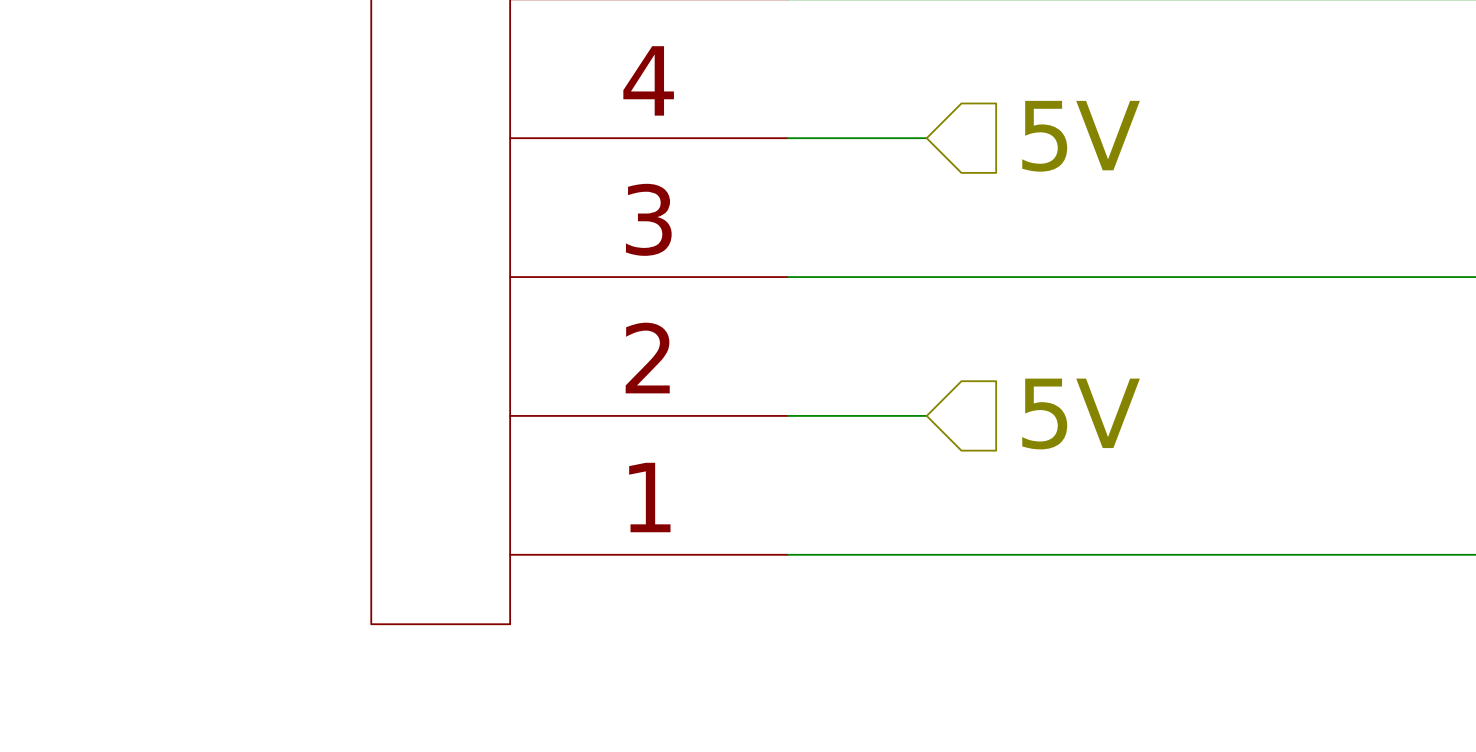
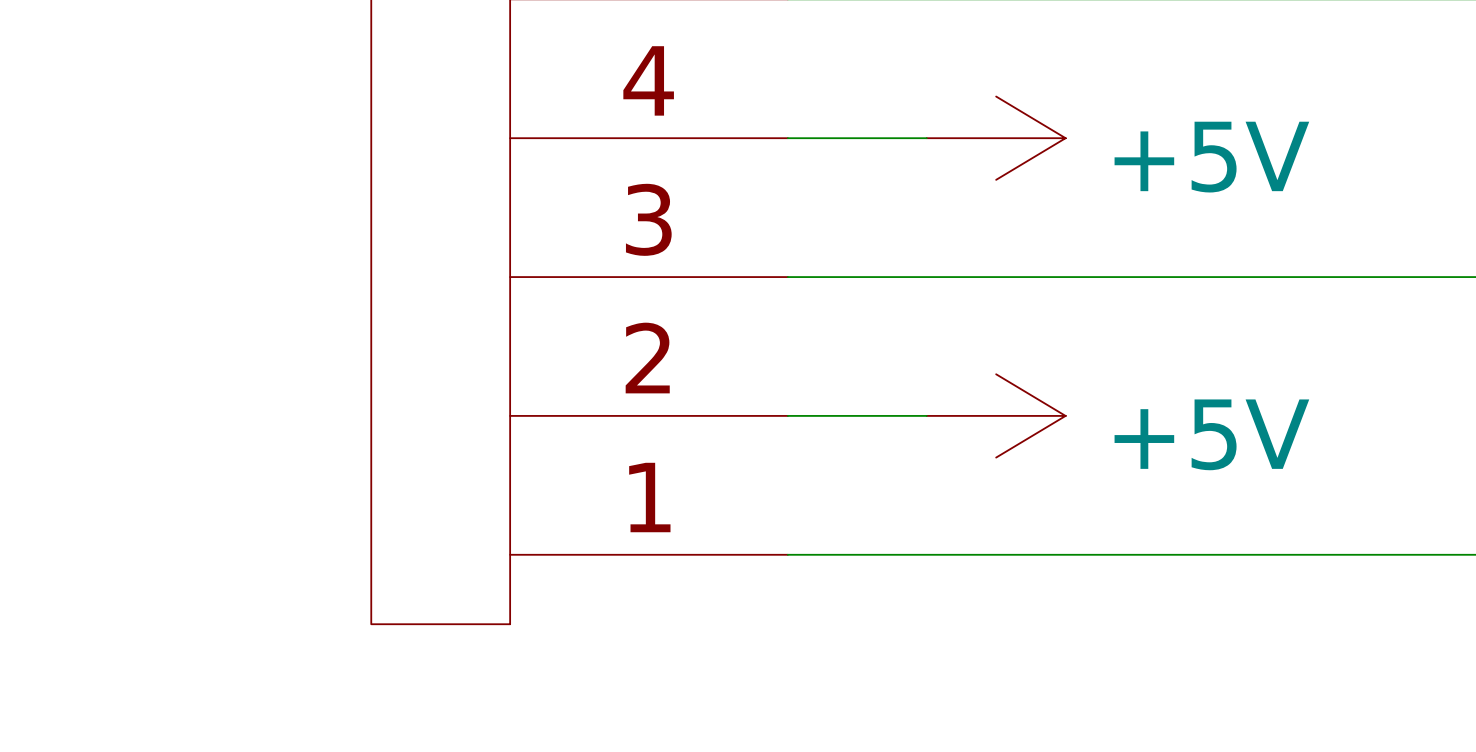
hierarchical label: 5V (1081, 136) -> none
power symbol: none -> +5V (996, 138)
hierarchical label: 5V (1081, 414) -> none
power symbol: none -> +5V (996, 415)

